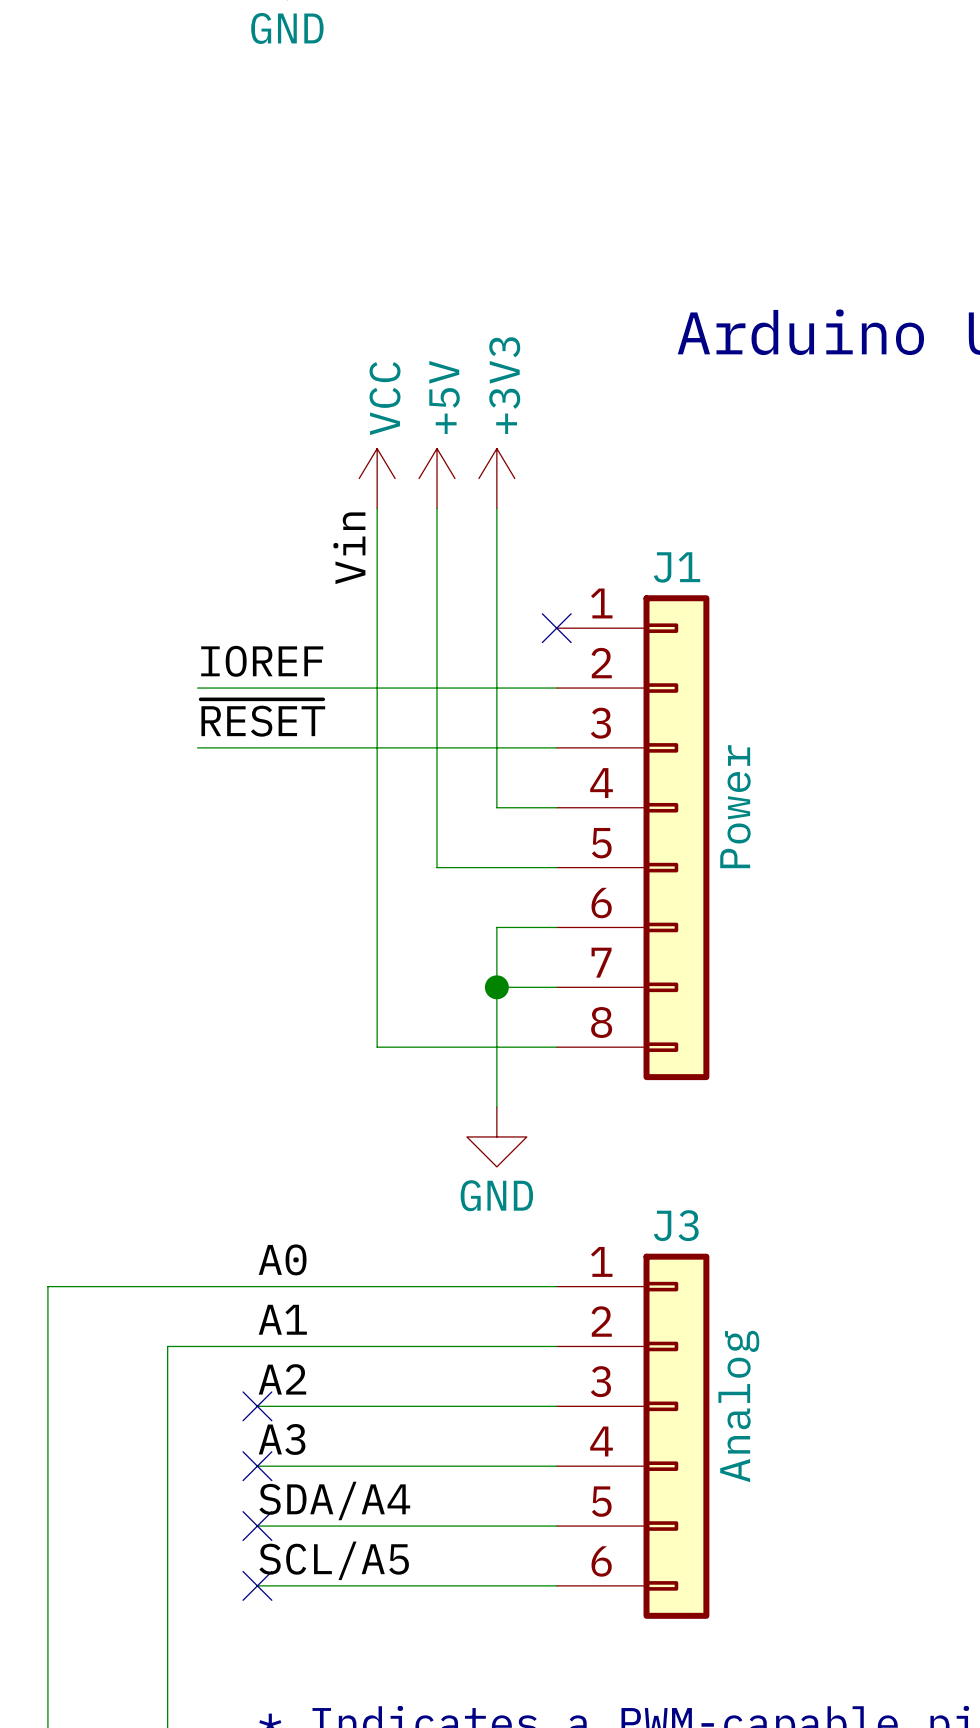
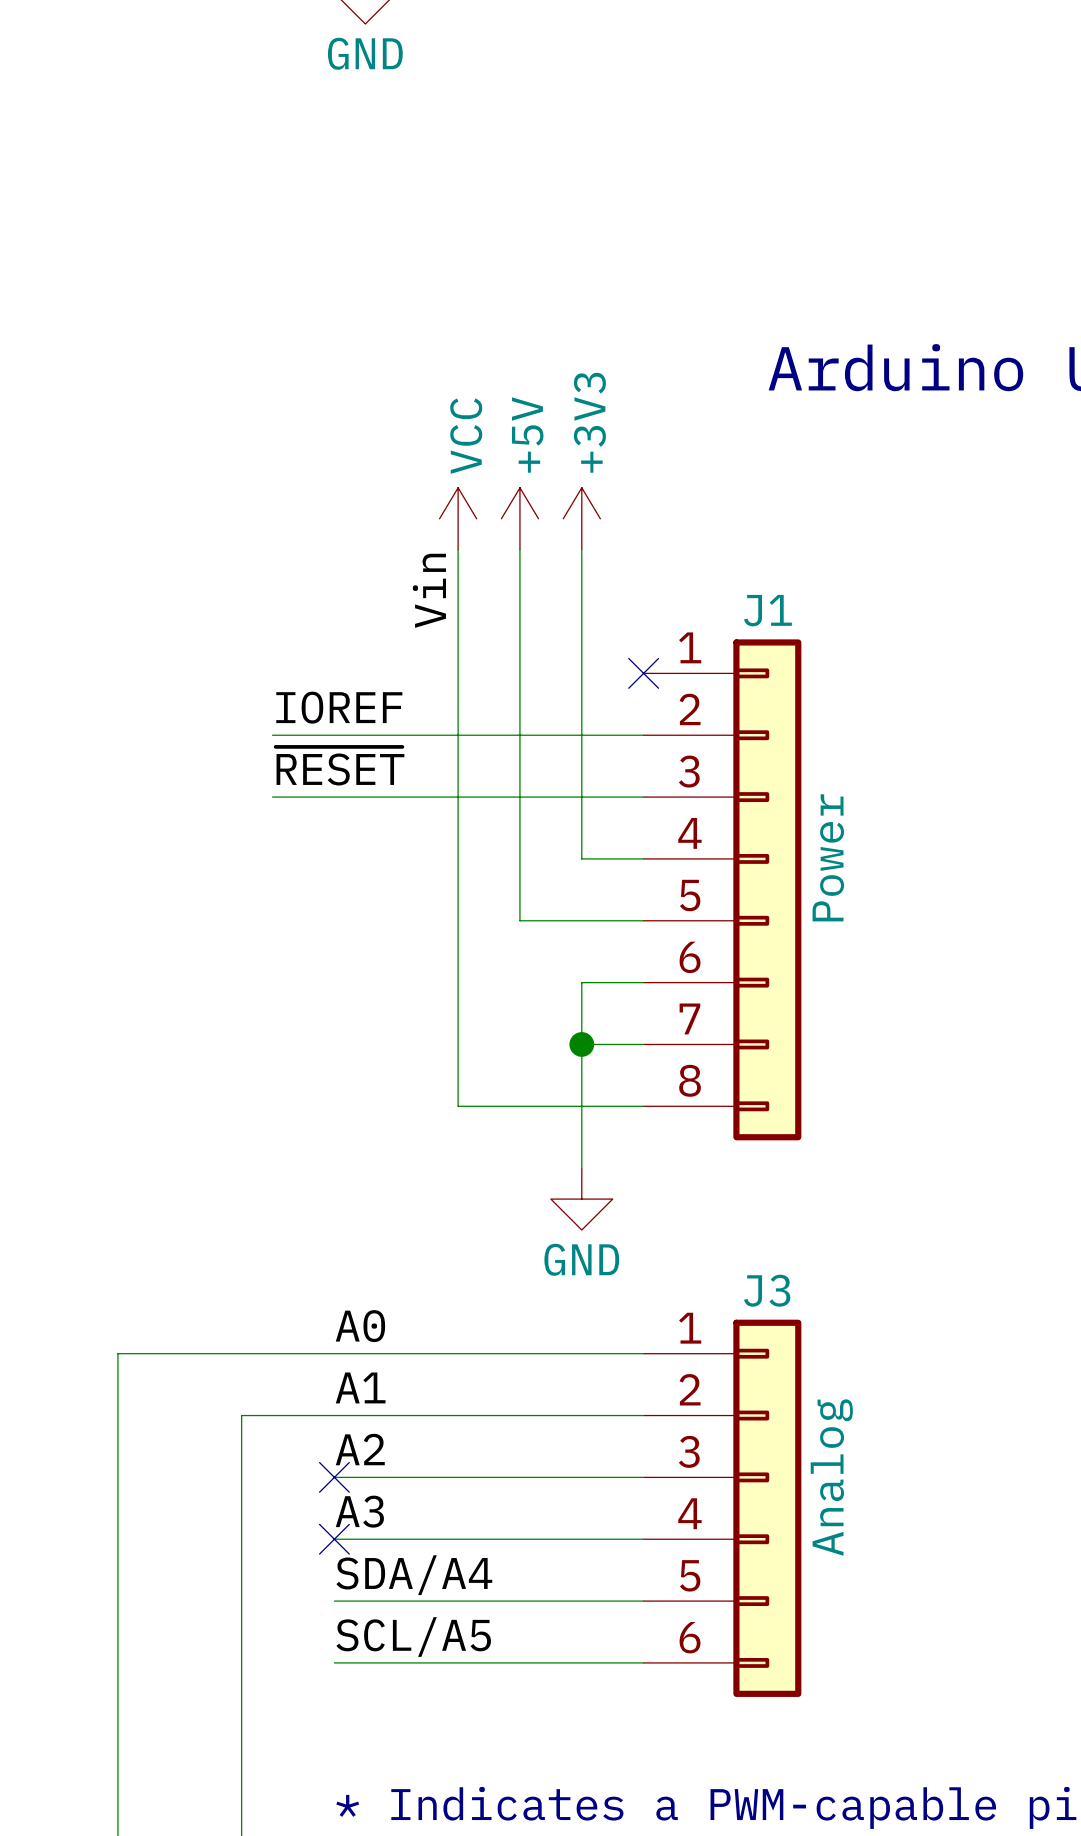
no-connect mark: (257, 1526) -> none
no-connect mark: (257, 1585) -> none

